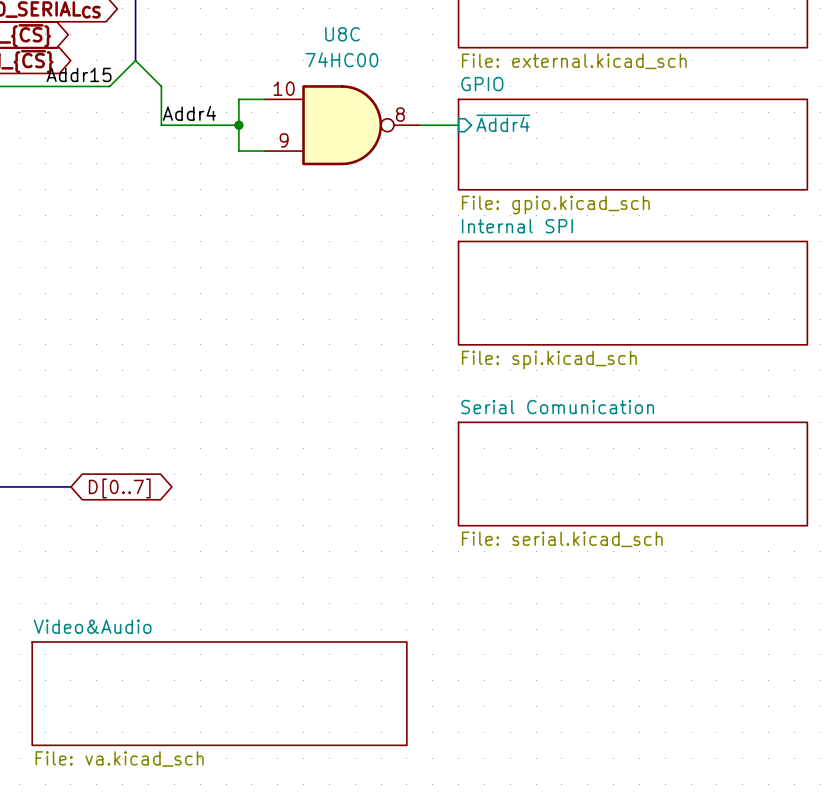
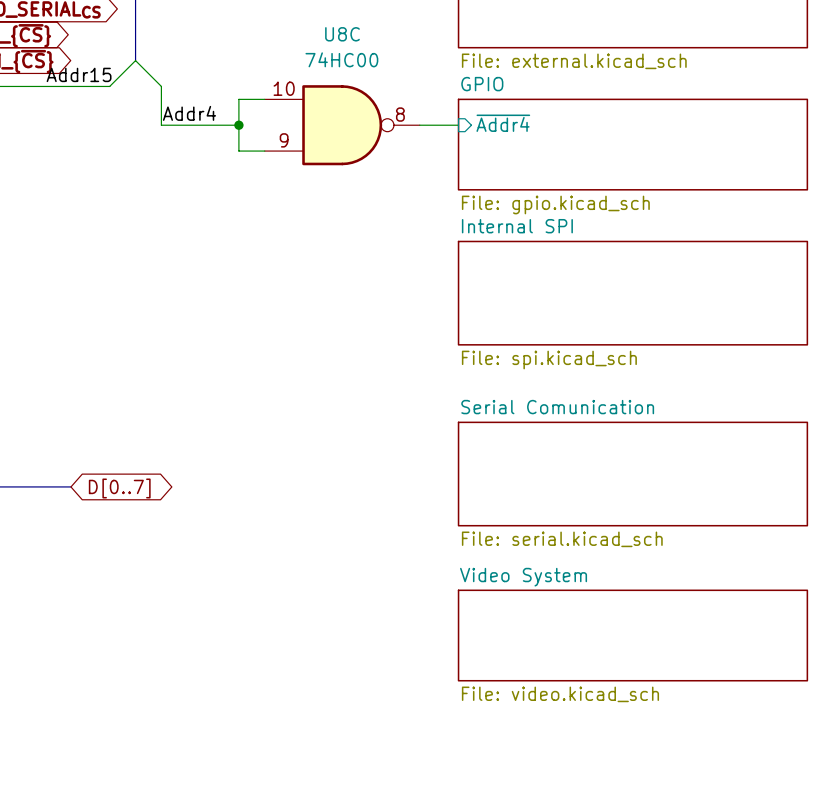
sheet Video System: none -> File: video.kicad_sch (632, 635)
sheet Video&Audio: File: va.kicad_sch (219, 693) -> none

